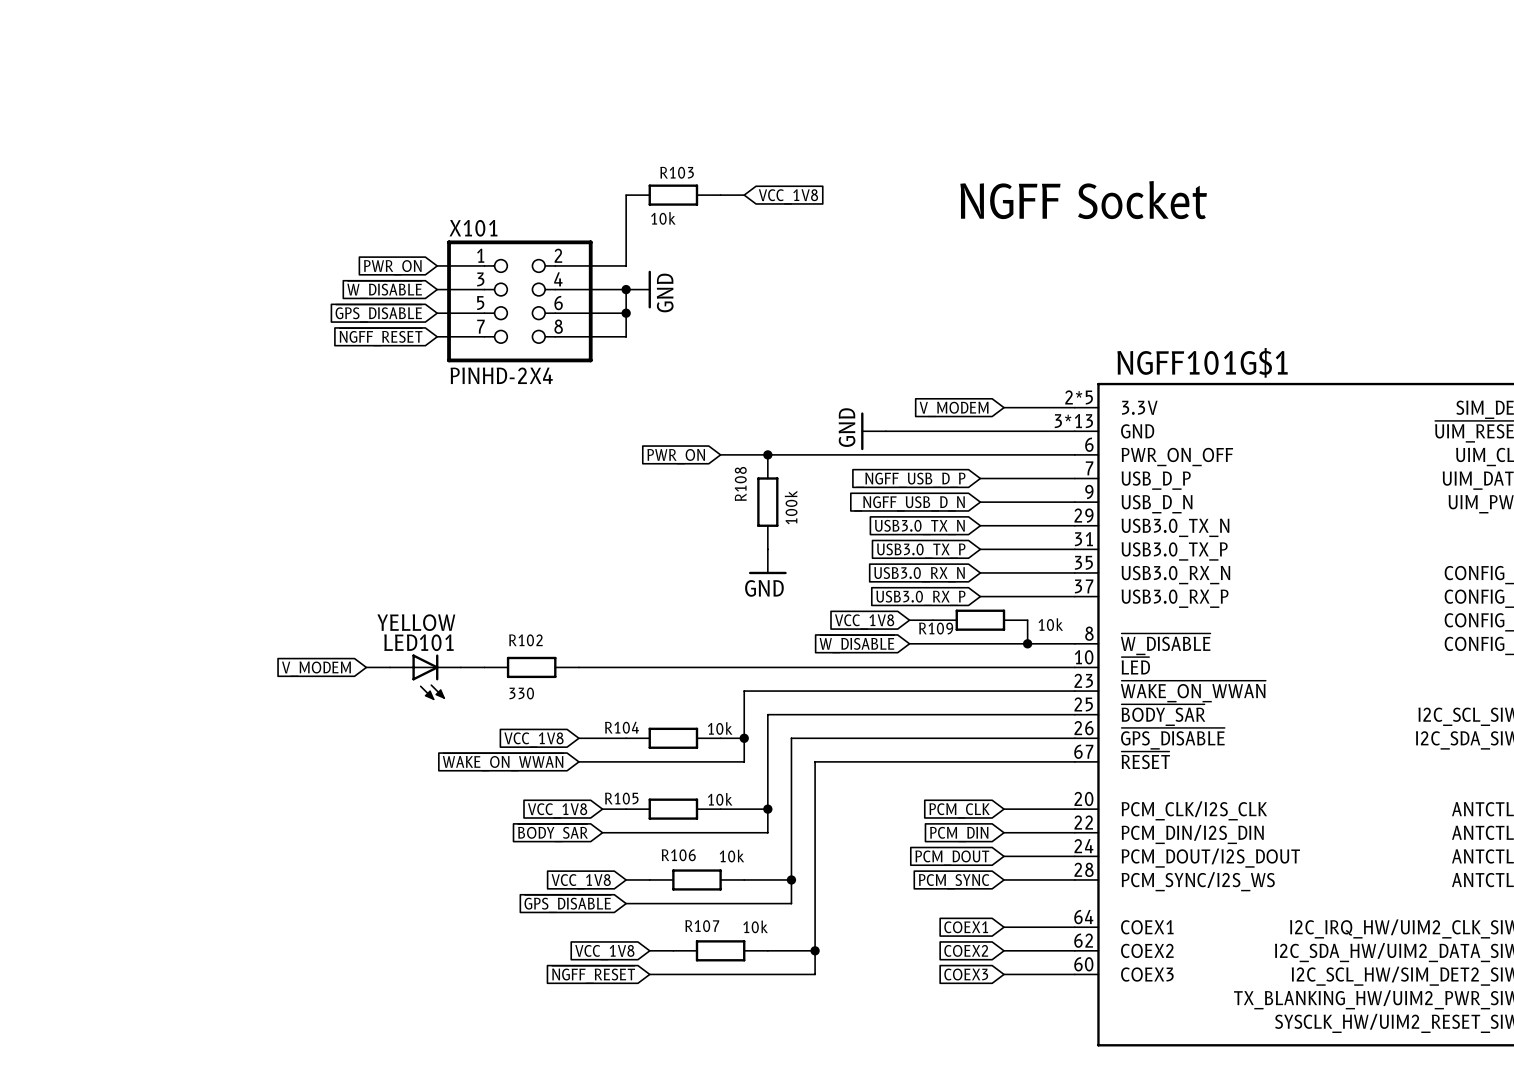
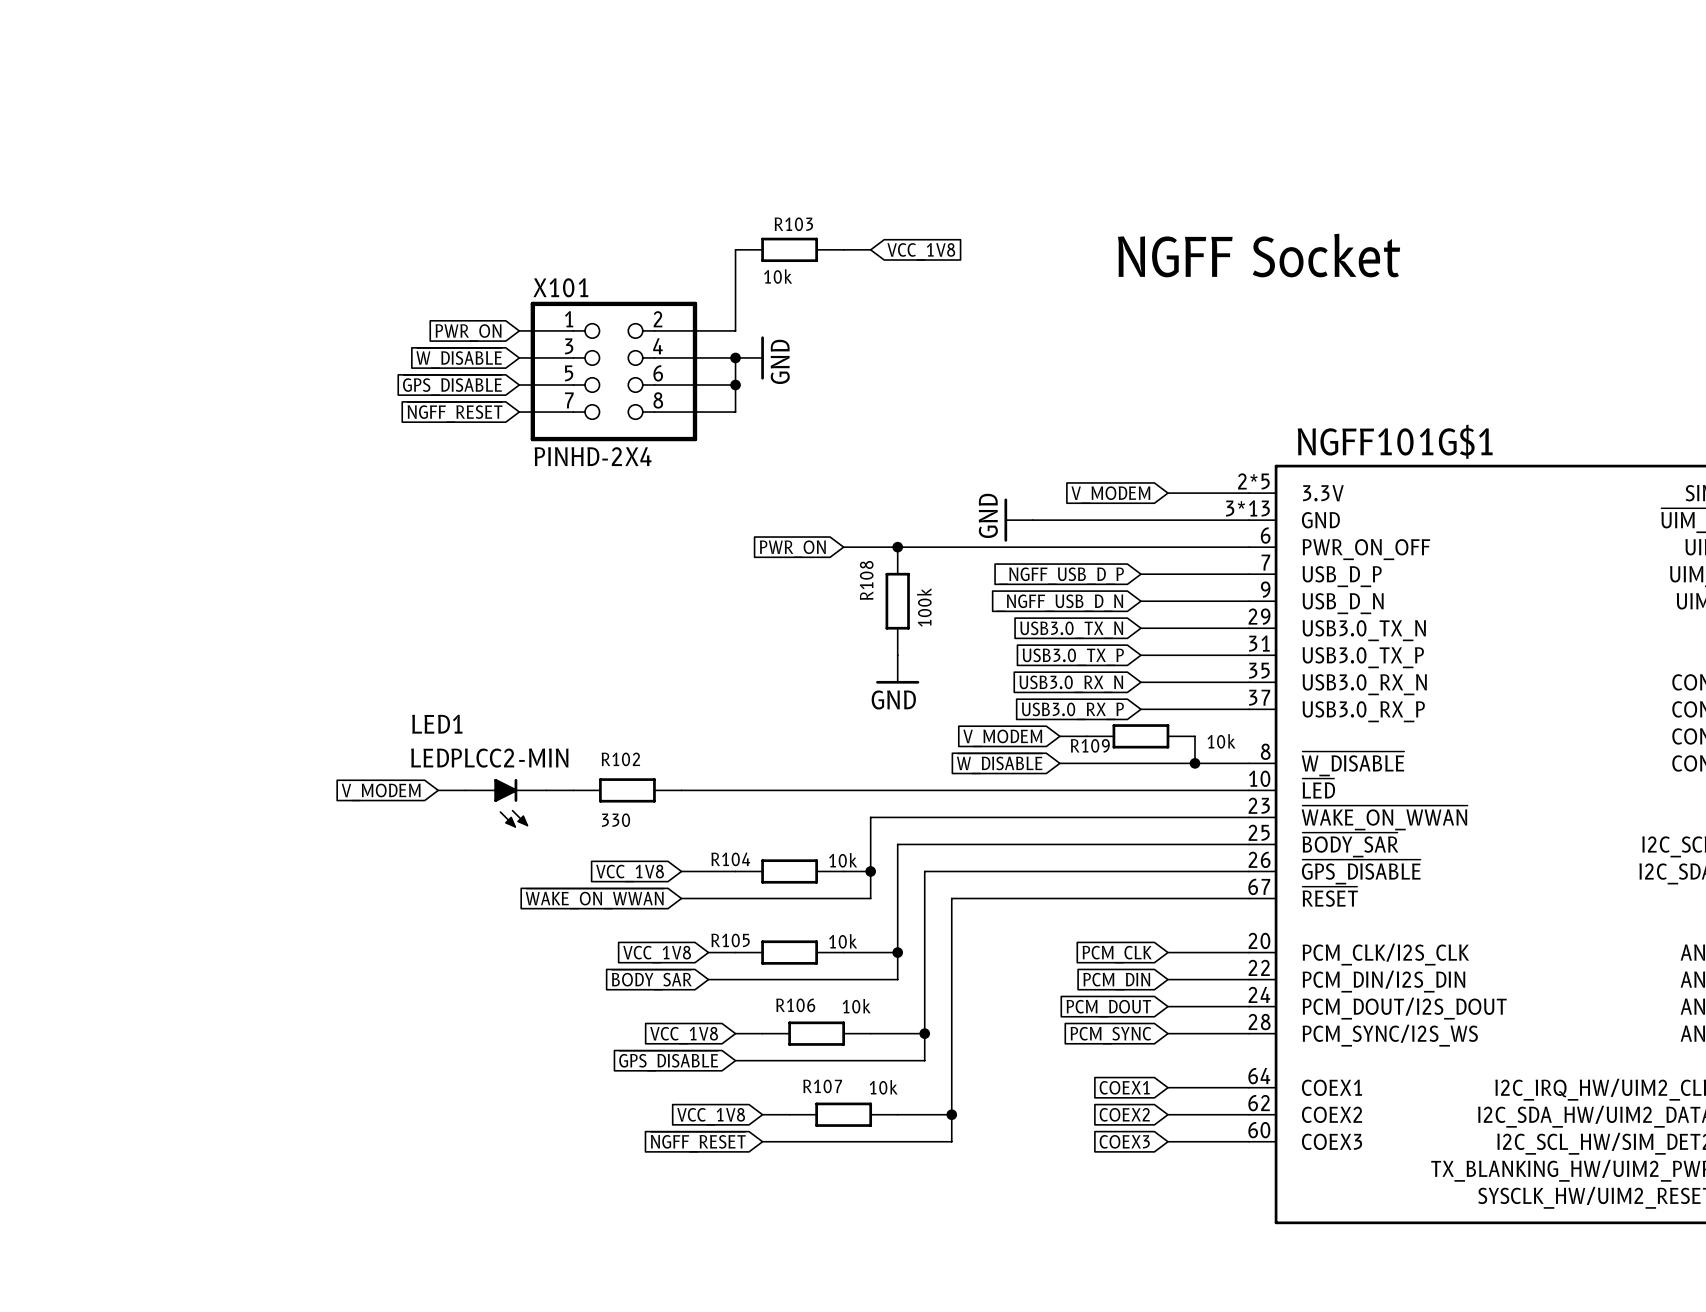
global label: VCC_1V8 (864, 621) -> V_MODEM (1002, 738)
LED101: YELLOW (425, 677) -> none
LED1: none -> LEDPLCC2-MIN (505, 803)

